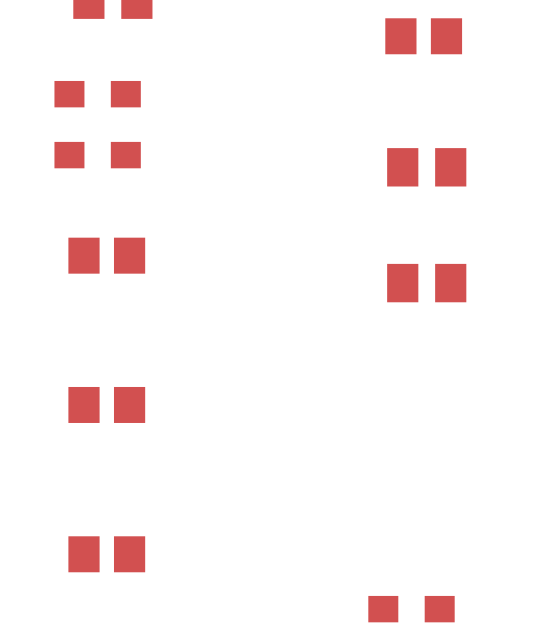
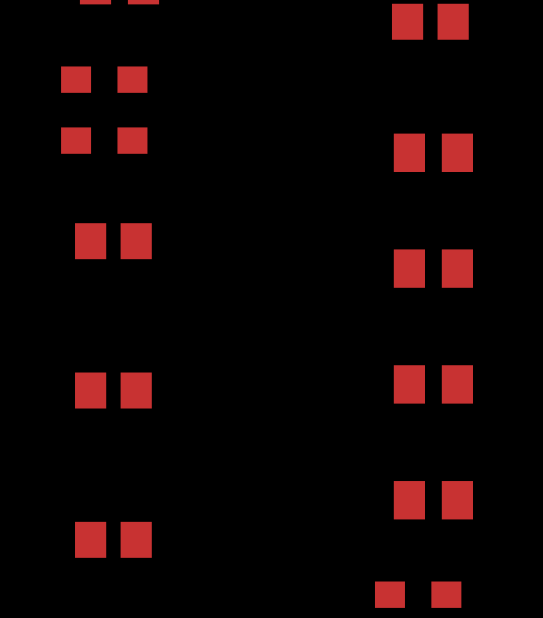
part: none -> (433, 384)
part: none -> (433, 500)

